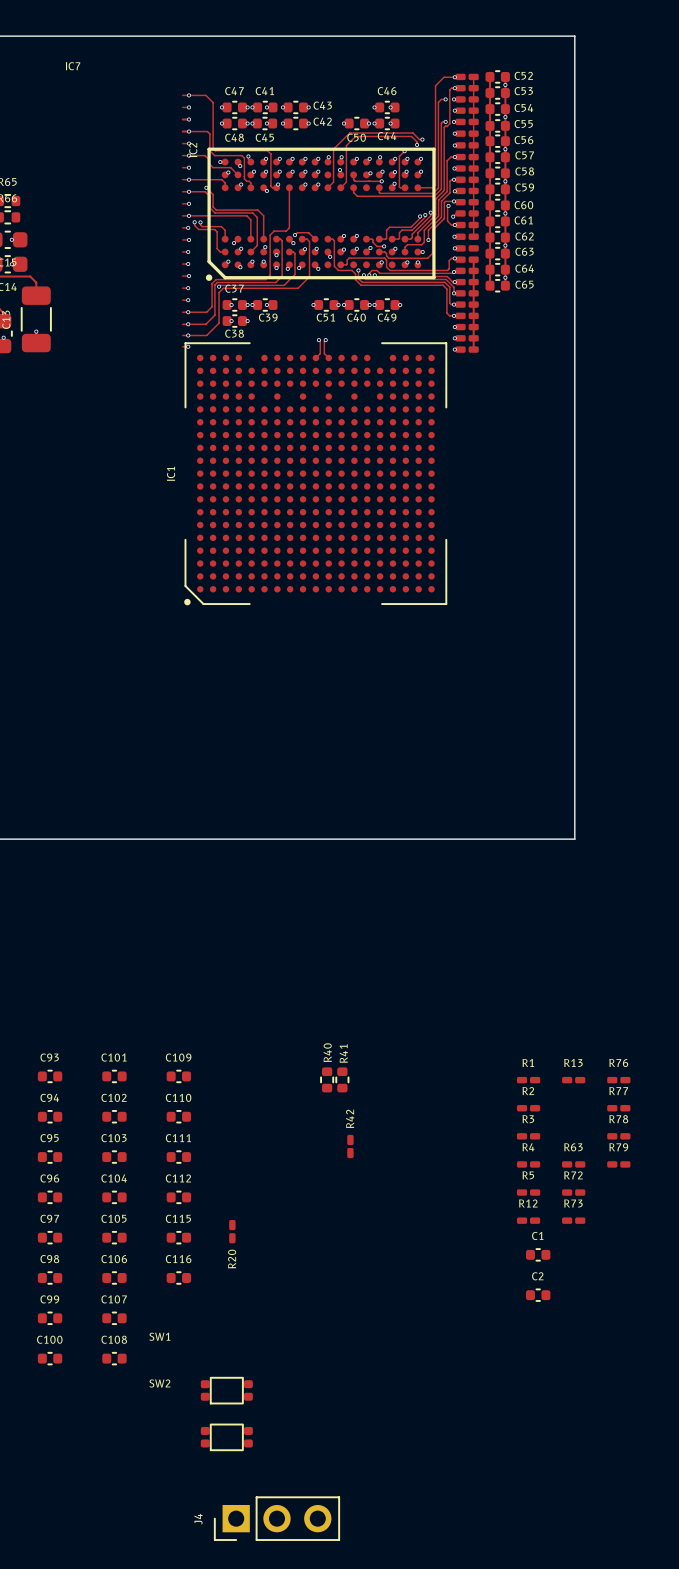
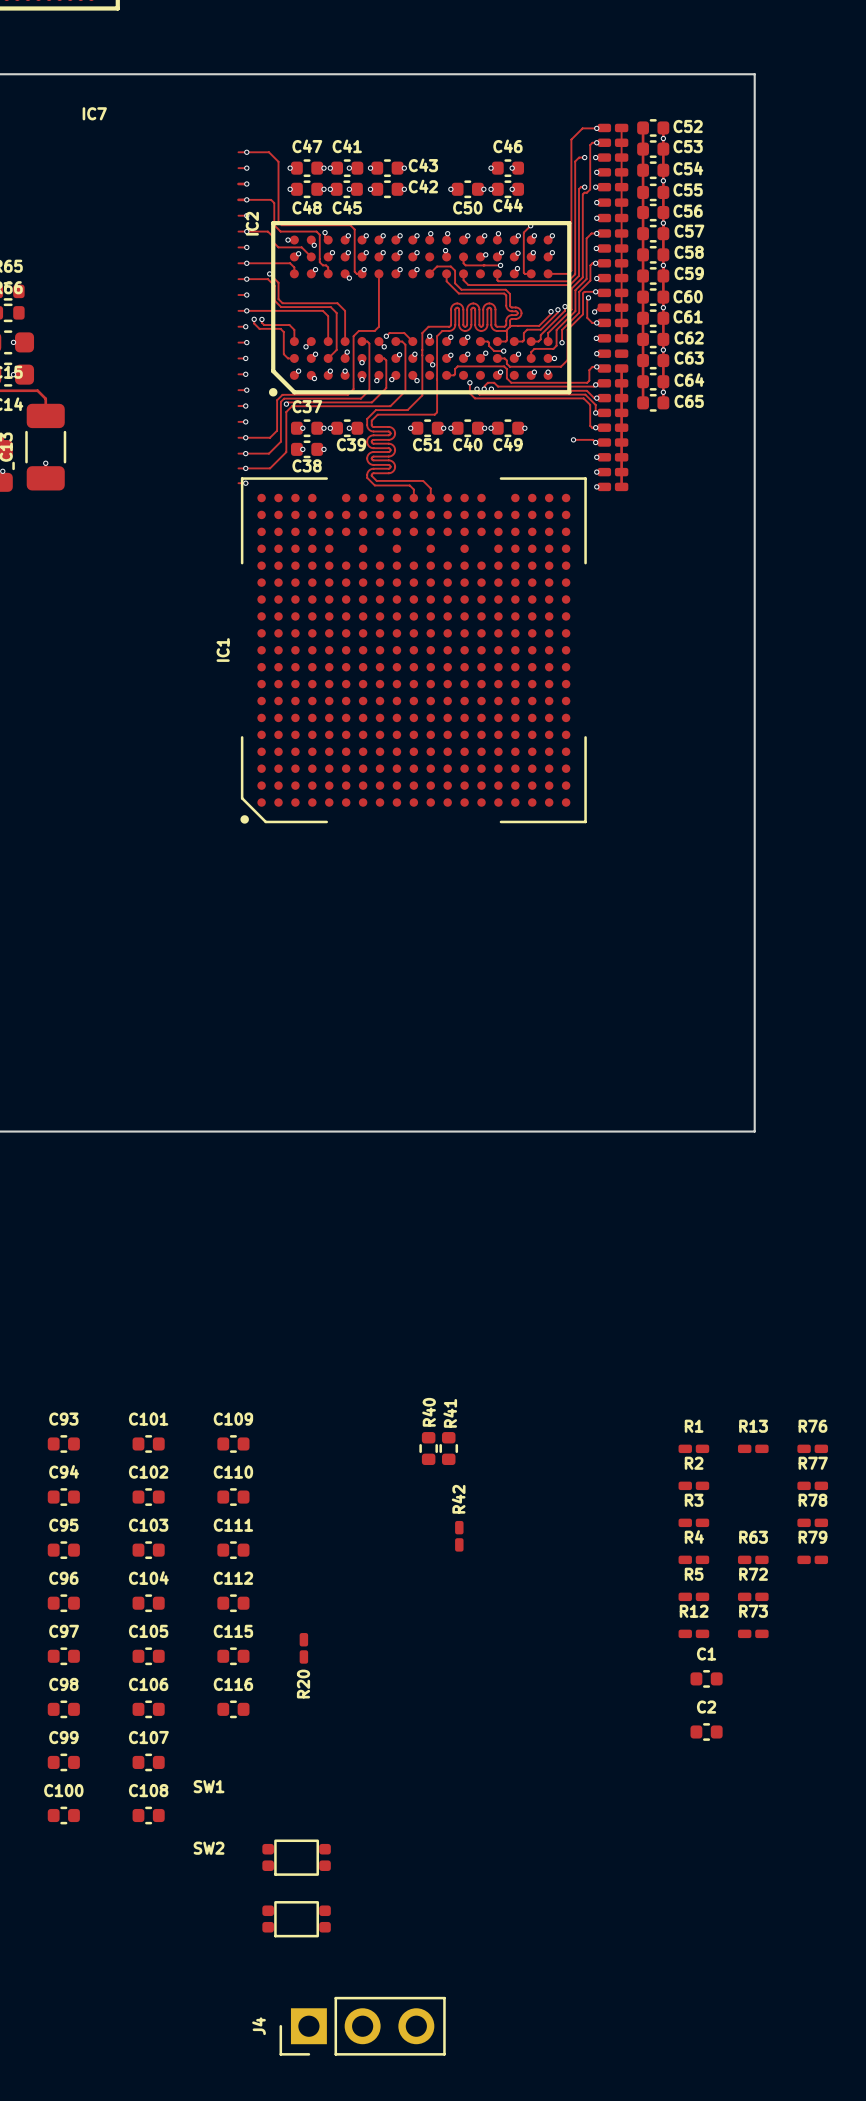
track: (422, 139) (419, 139) (412, 133) (349, 133) (333, 149) (333, 182) -> (510, 326) (510, 319) (518, 318) (521, 312) (518, 308) (510, 306) (510, 293) (505, 289) (461, 289) (455, 283) (455, 270) (450, 266) (437, 266)
via: (422, 139) -> none
track: (417, 144) (417, 141) (411, 136) (355, 136) (346, 145) (346, 182) (340, 187) -> none
via: (417, 144) -> none
via: none -> (429, 336)
track: (327, 239) (334, 240) (334, 266) (338, 270) (351, 270) (355, 274) (355, 279) (361, 285) (443, 285) (446, 289) (446, 313) (449, 315) (454, 315) -> (573, 439) (593, 439) (595, 442)
via: none -> (573, 439)
track: (318, 340) (320, 353) (315, 357) -> (446, 273) (446, 281) (458, 293) (504, 293) (506, 295) (507, 308) (517, 313) (507, 316) (504, 326) (496, 326) (495, 307) (492, 304) (487, 303) (483, 308) (483, 325) (480, 326) (479, 307) (476, 304) (471, 303) (467, 307) (467, 325) (465, 326) (462, 306) (459, 303) (453, 304) (451, 308) (450, 326) (428, 326) (422, 333) (422, 395) (407, 410) (375, 410) (367, 418) (367, 426) (370, 430) (388, 431) (390, 433) (388, 435) (372, 435) (367, 438) (367, 443) (370, 447) (388, 448) (390, 450) (388, 452) (370, 453) (367, 457) (368, 462) (372, 464) (389, 464) (390, 466) (388, 468) (370, 469) (367, 472) (367, 477) (374, 485) (409, 485) (413, 489) (413, 498)
via: (318, 340) -> none
track: (325, 340) (324, 353) (328, 357) -> (506, 329) (496, 330) (492, 328) (491, 309) (489, 307) (487, 309) (486, 327) (483, 330) (478, 330) (475, 326) (475, 309) (473, 307) (471, 309) (470, 327) (467, 330) (462, 330) (459, 325) (459, 309) (456, 307) (454, 328) (450, 330) (442, 330) (437, 336) (437, 412) (434, 414) (377, 414) (371, 420) (372, 426) (390, 427) (395, 433) (390, 439) (373, 439) (371, 441) (373, 443) (389, 443) (393, 446) (394, 451) (392, 455) (373, 456) (371, 458) (373, 460) (391, 461) (394, 464) (394, 469) (390, 473) (373, 473) (371, 475) (376, 480) (423, 480) (430, 488) (430, 498)
via: (325, 340) -> none

